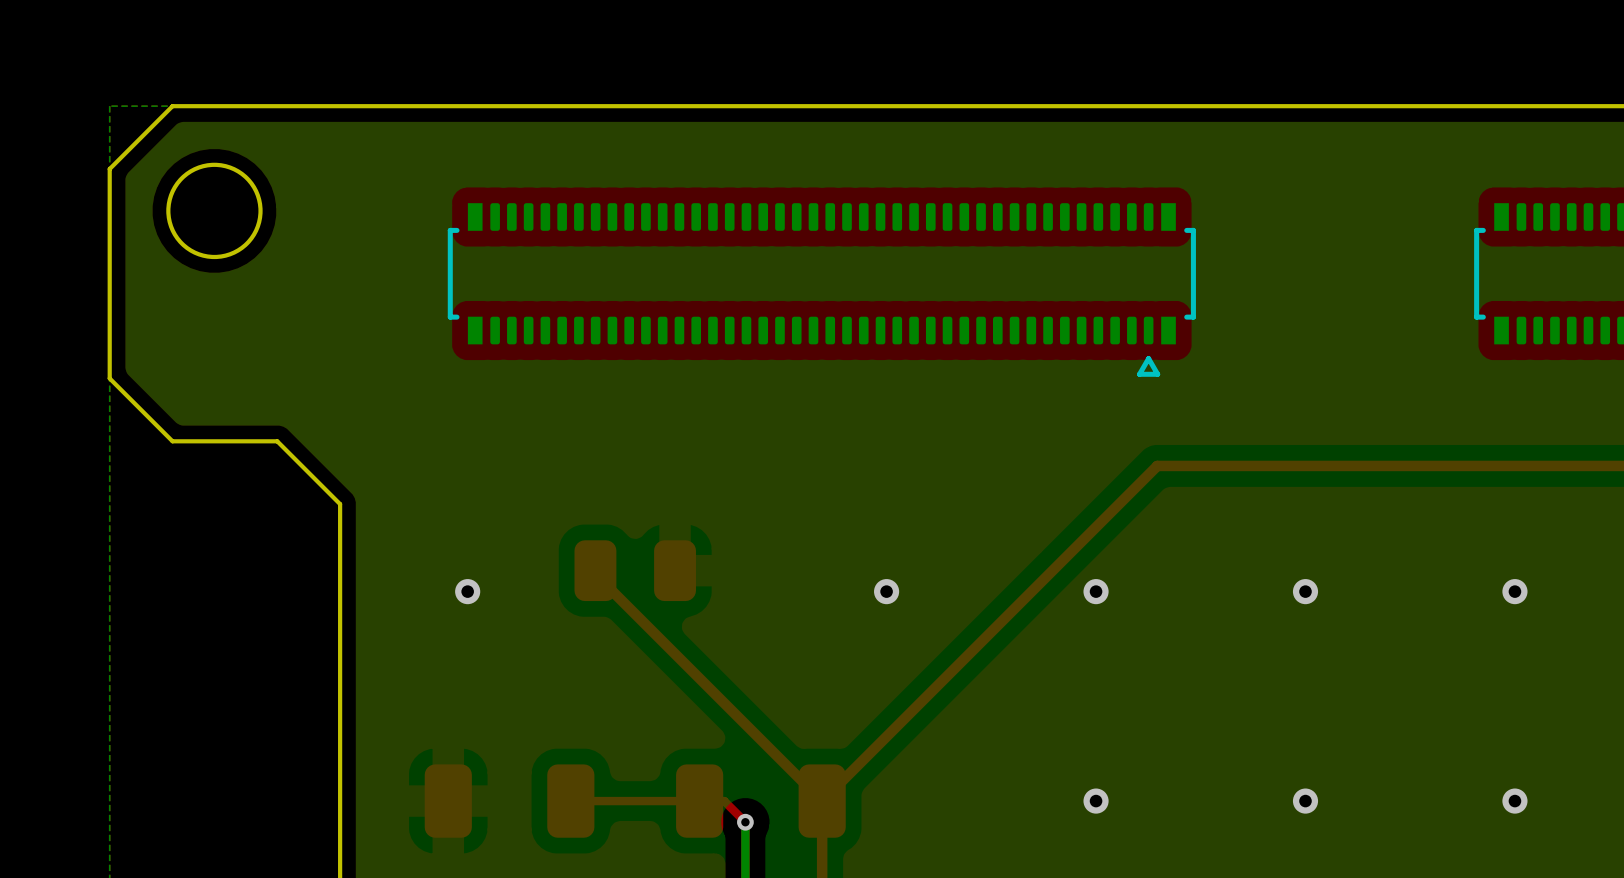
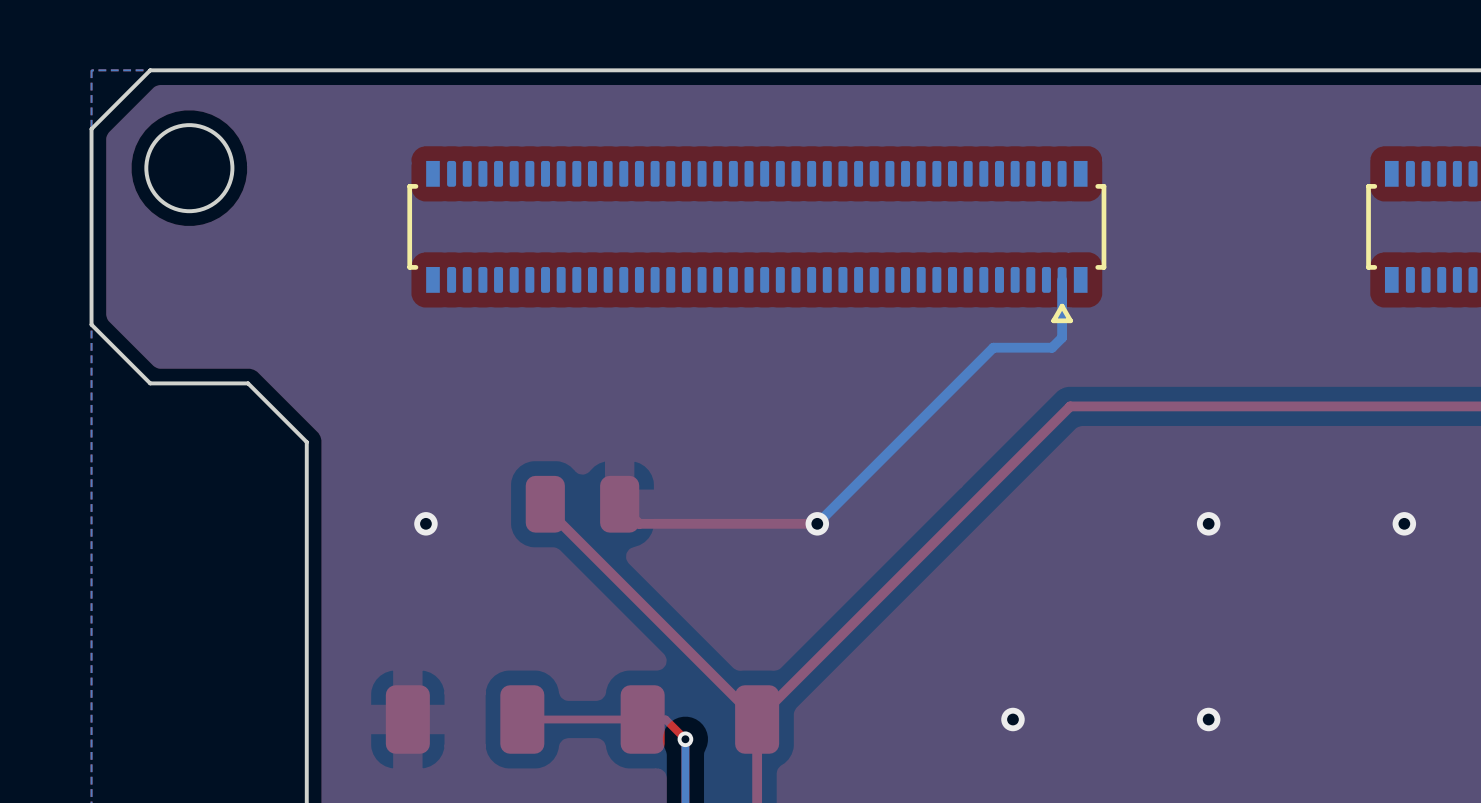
bottom track: none -> (1062, 279) (1062, 337) (1052, 347) (993, 347) (817, 523)
top track: none -> (619, 504) (639, 523) (817, 523)
via: (1096, 591) -> none
via: (1514, 801) -> none

